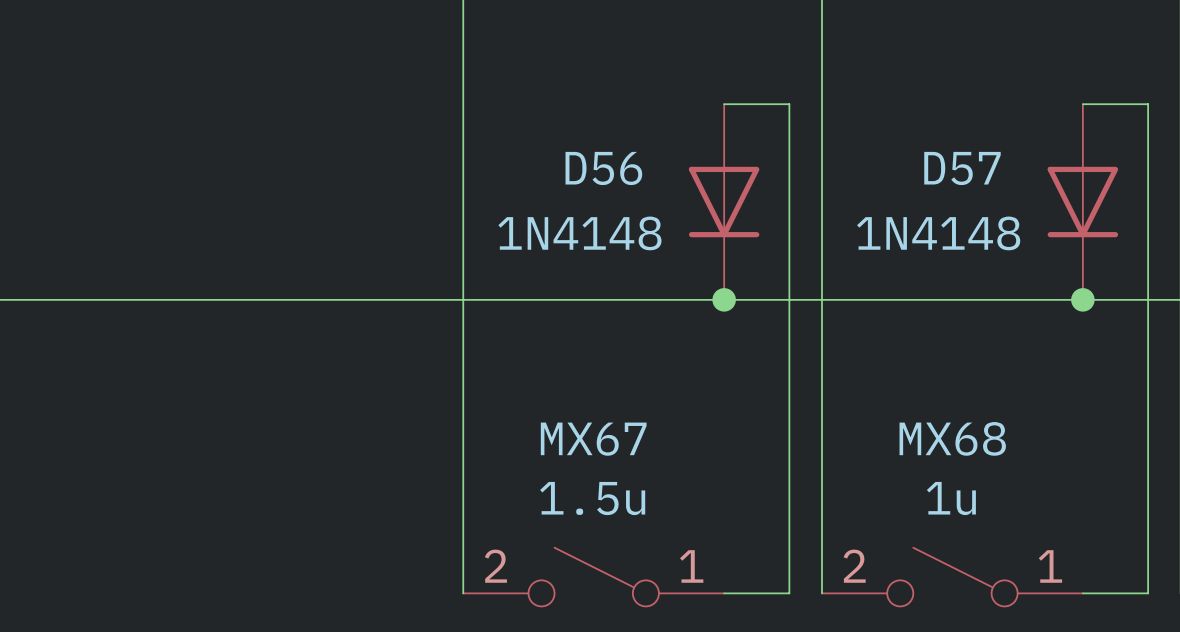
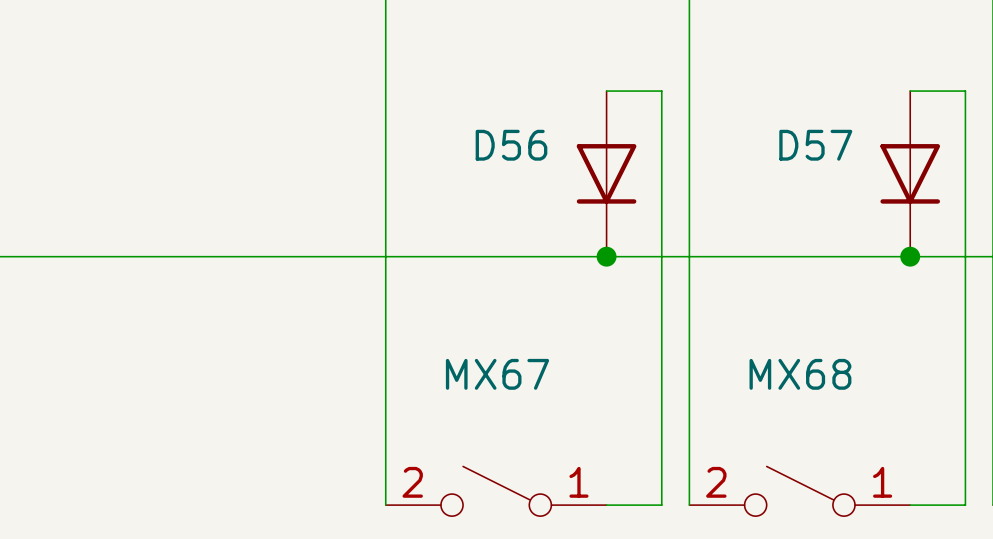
D56 value: 1N4148 (579, 233) -> none
D57 value: 1N4148 (938, 233) -> none
MX67 value: 1.5u (592, 498) -> none
MX68 value: 1u (951, 498) -> none

